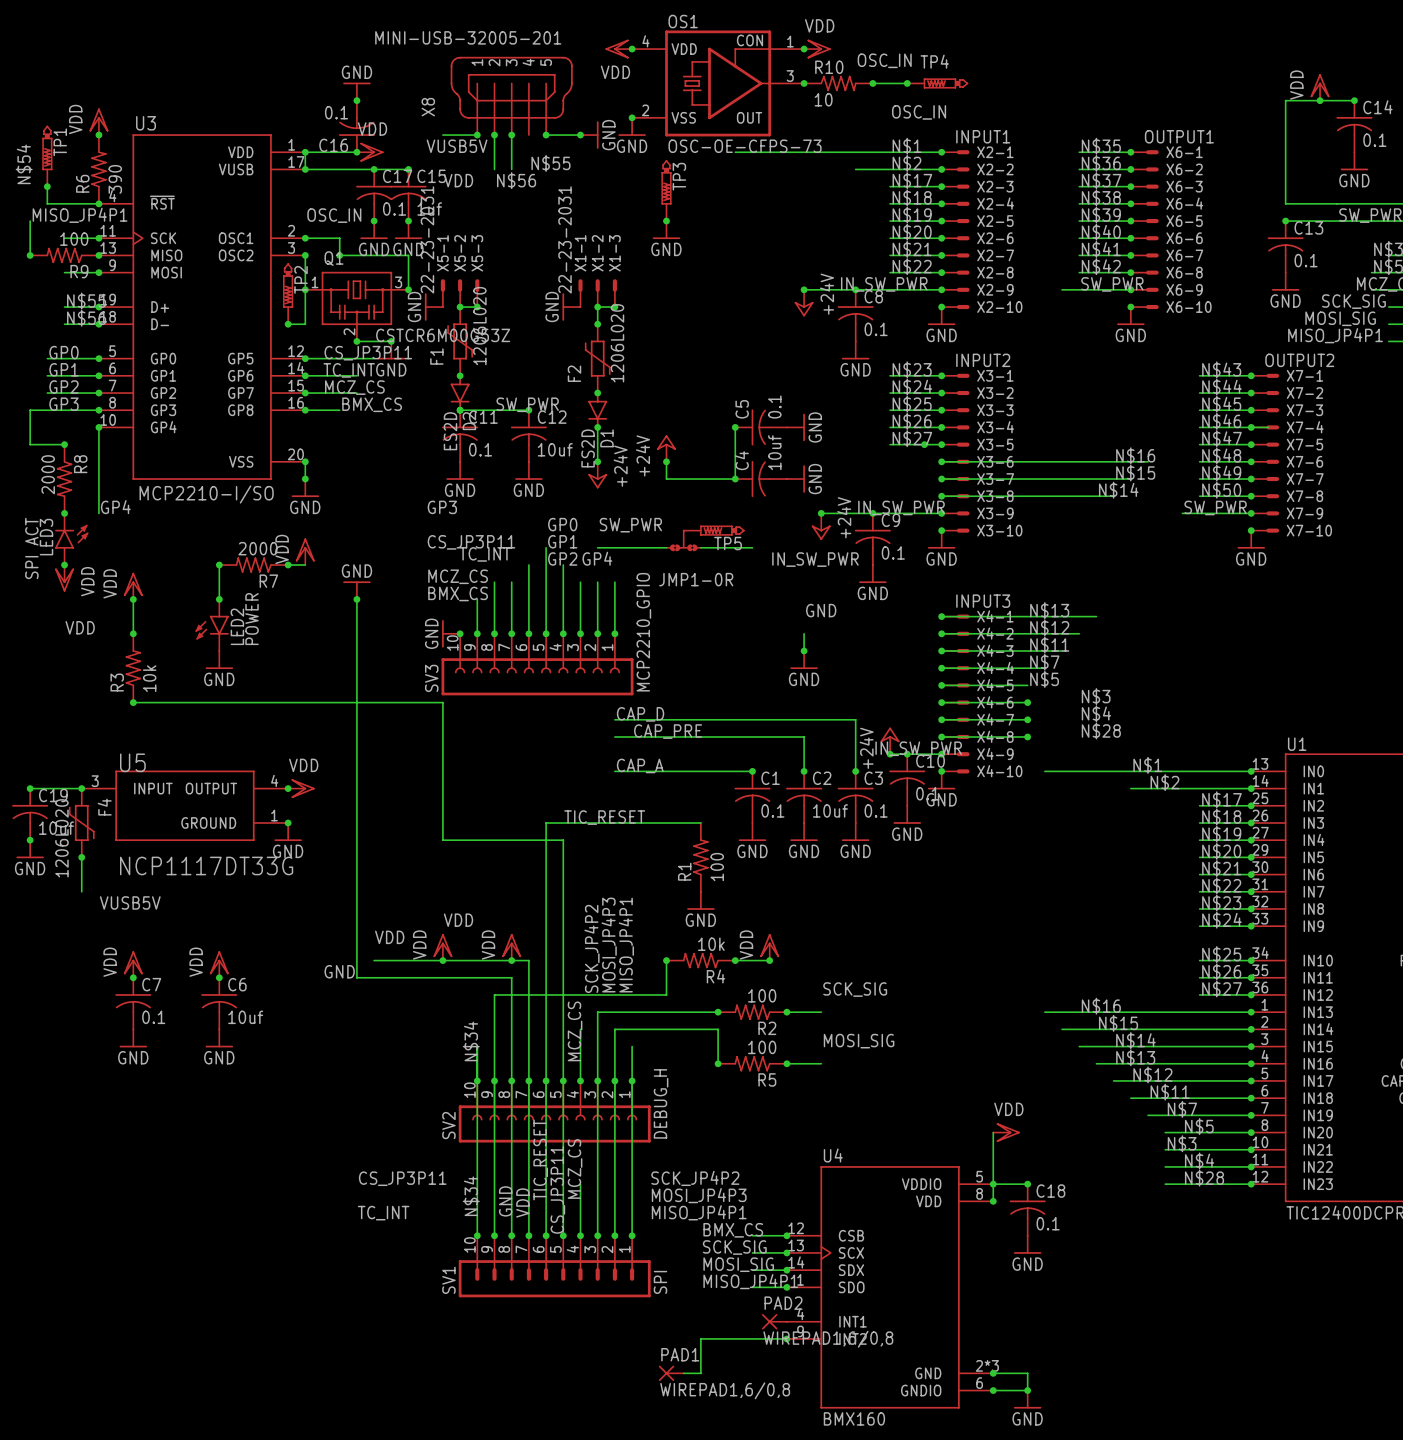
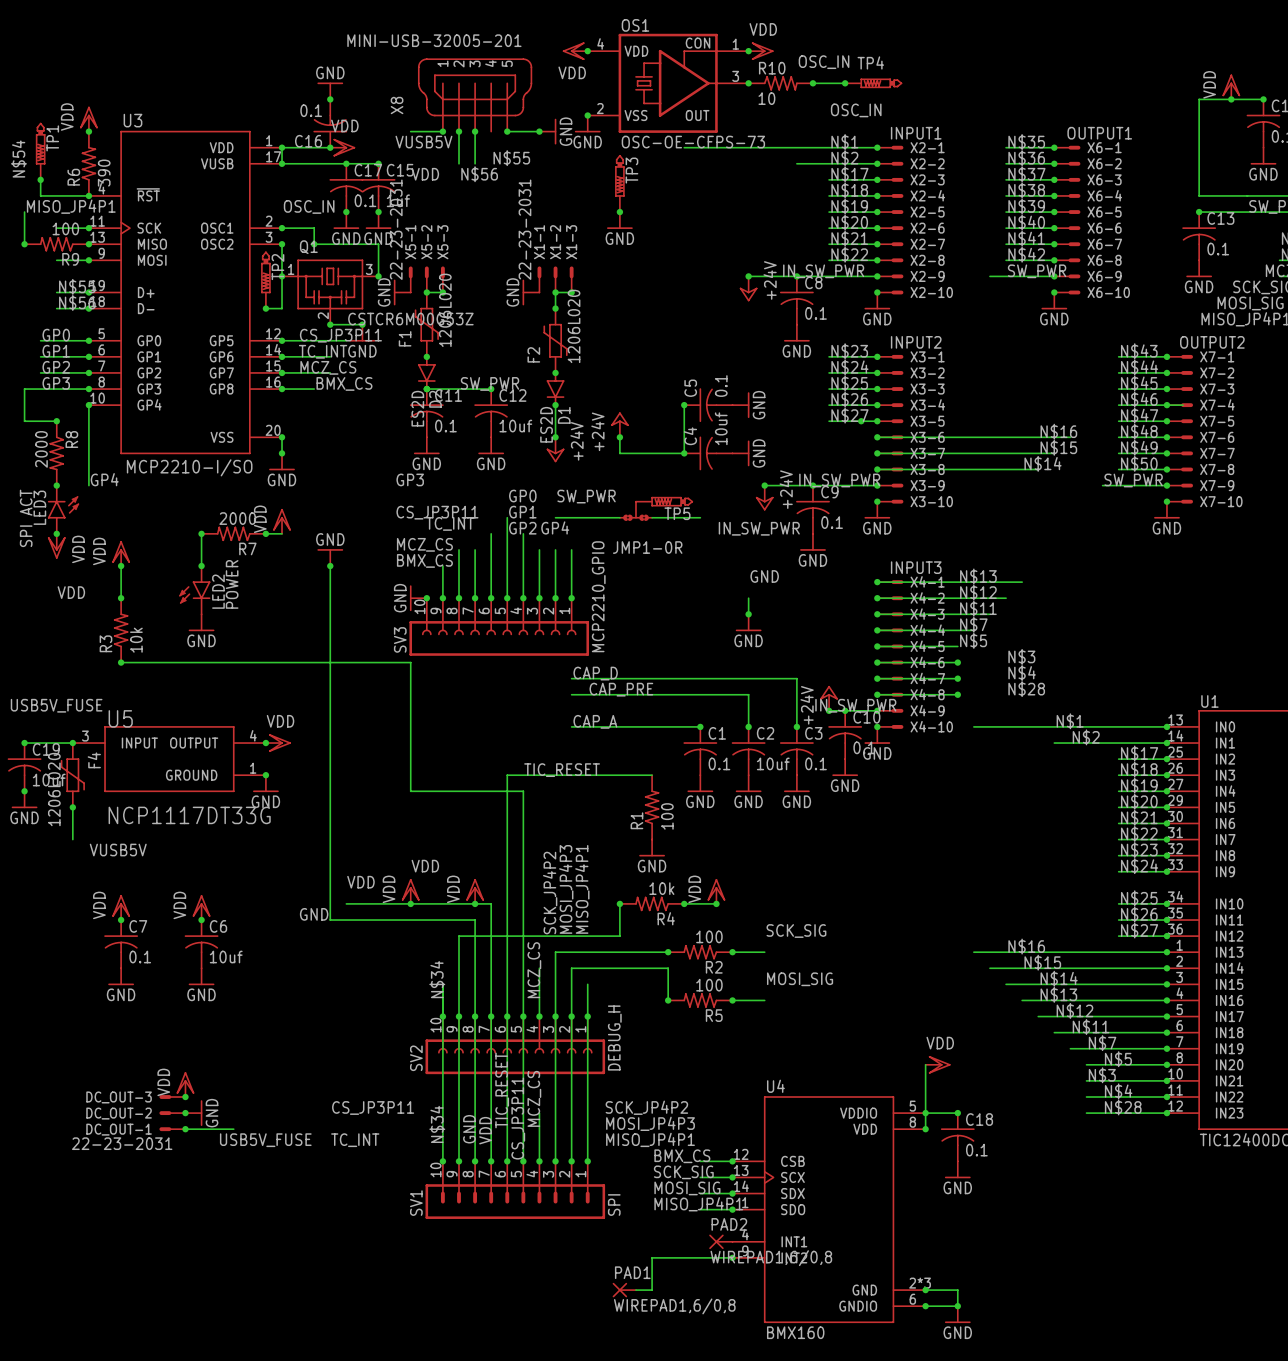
label: none -> USB5V_FUSE (56, 705)
power symbol: none -> VDD (185, 1084)
DC_OUT-3: none -> (172, 1097)
junction: none -> (185, 1097)
DC_OUT-2: none -> (172, 1113)
junction: none -> (185, 1113)
power symbol: none -> GND (193, 1113)
DC_OUT-1: none -> 22-23-2031 (172, 1129)
wire: none -> (185, 1129) (233, 1129)
junction: none -> (185, 1129)
label: none -> USB5V_FUSE (265, 1140)

